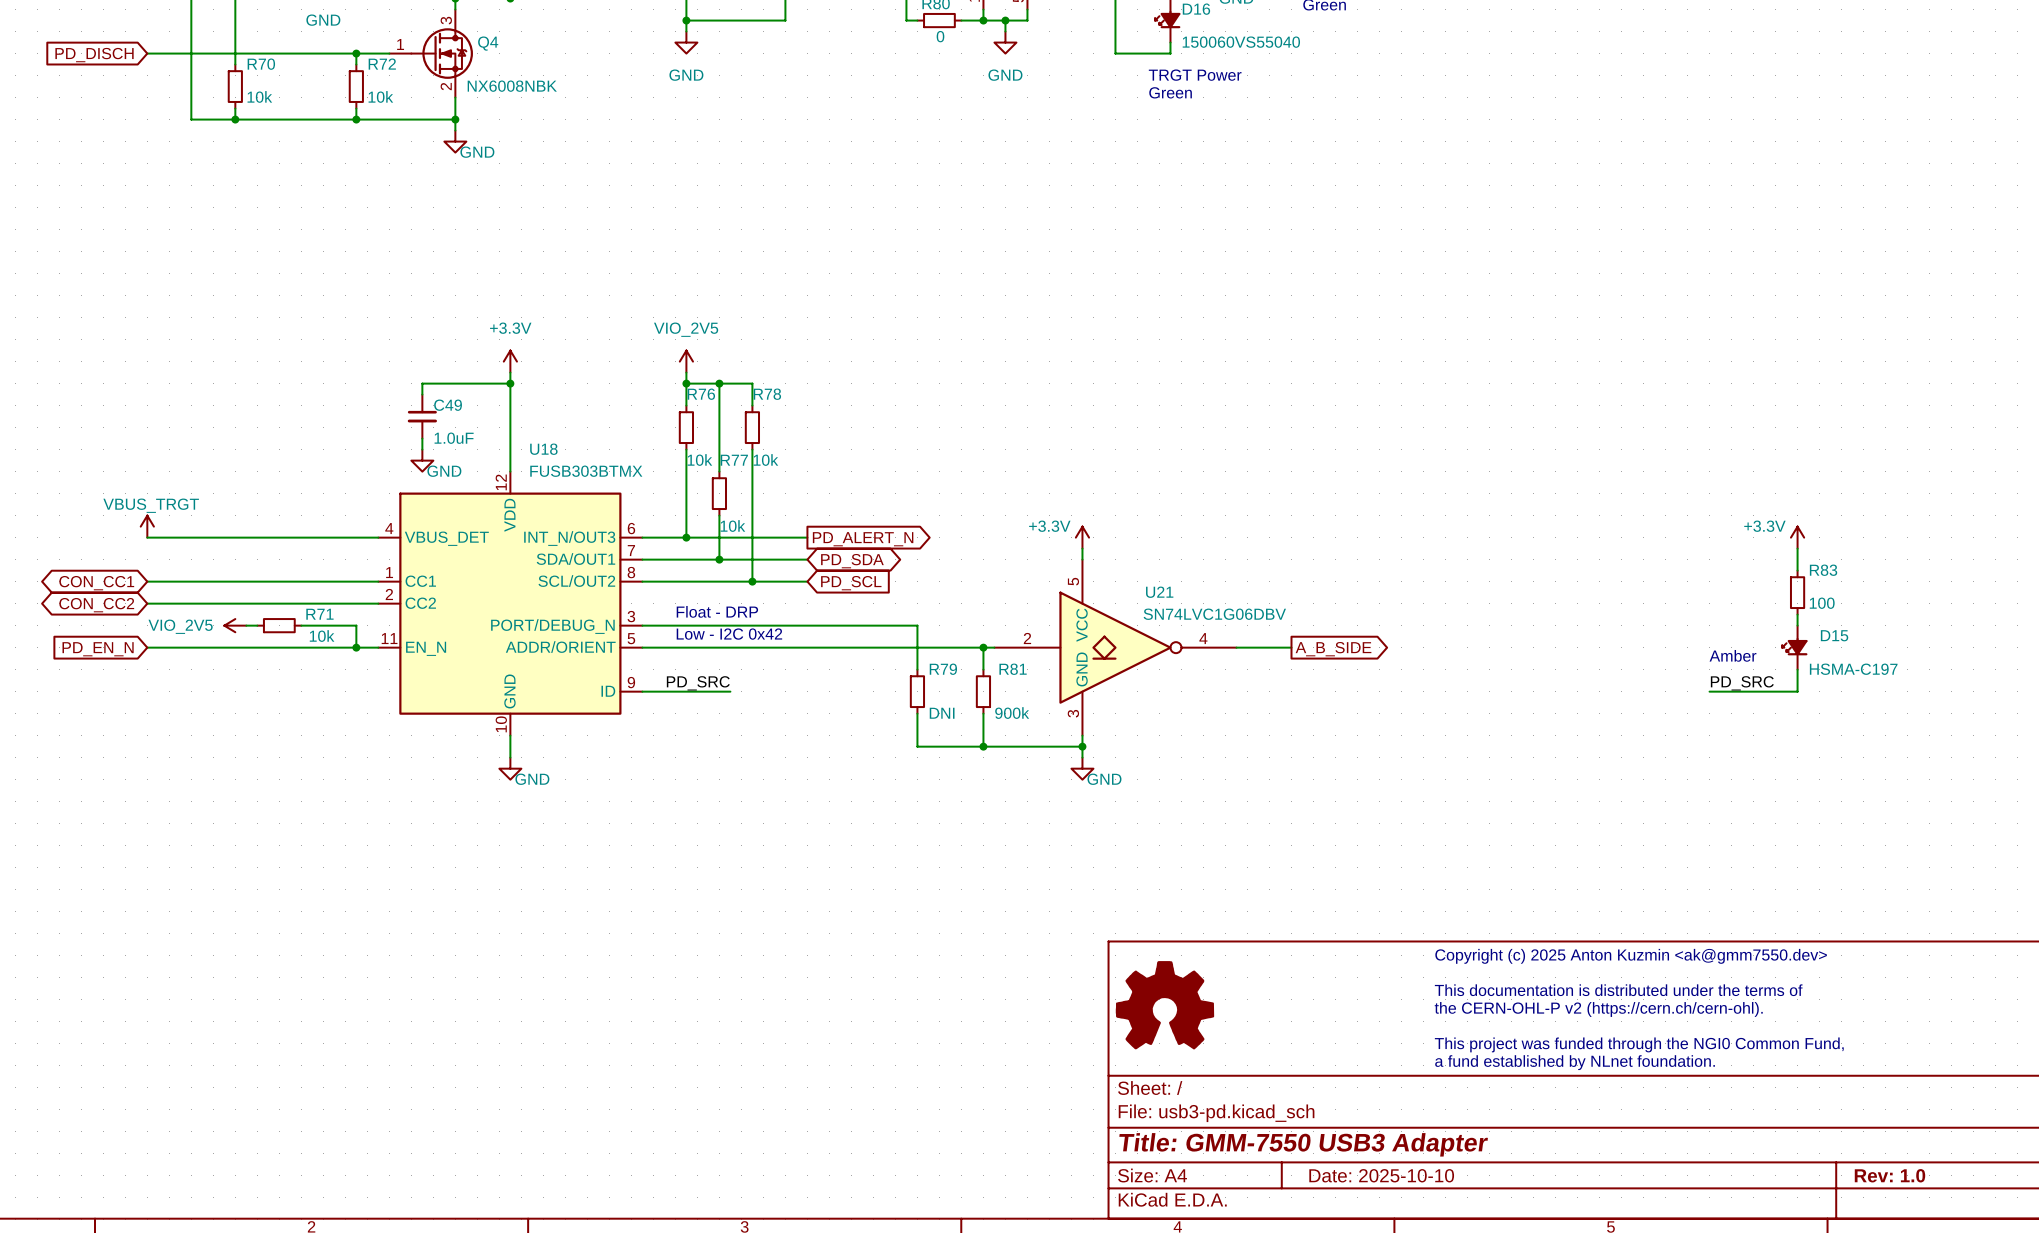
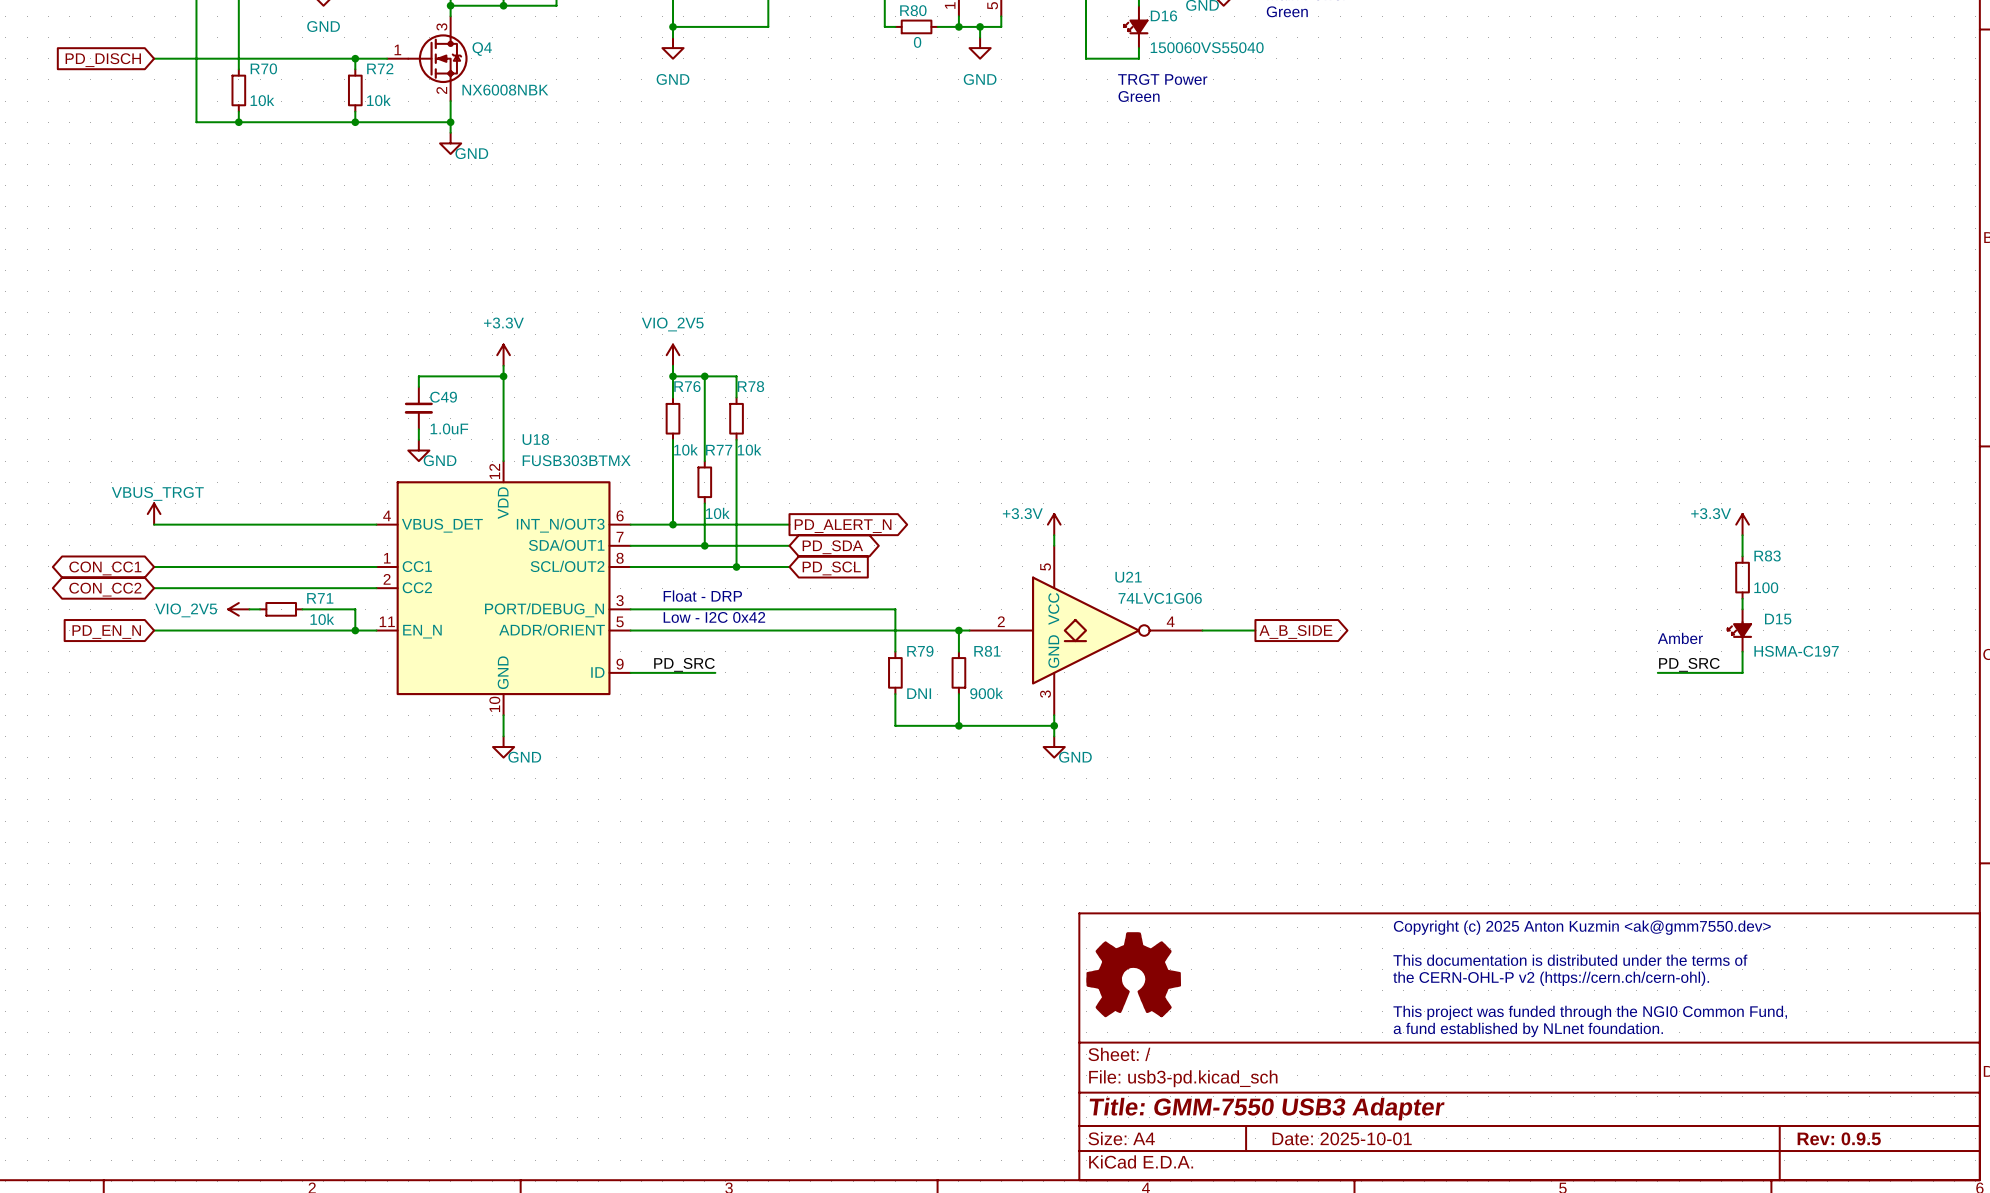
U21 value: SN74LVC1G06DBV (1214, 614) -> 74LVC1G06 (1160, 598)
title block: Date: 2025-10-10 (1381, 1175) -> Date: 2025-10-01 (1342, 1138)
title block: Rev: 1.0 (1889, 1175) -> Rev: 0.9.5 (1839, 1138)

